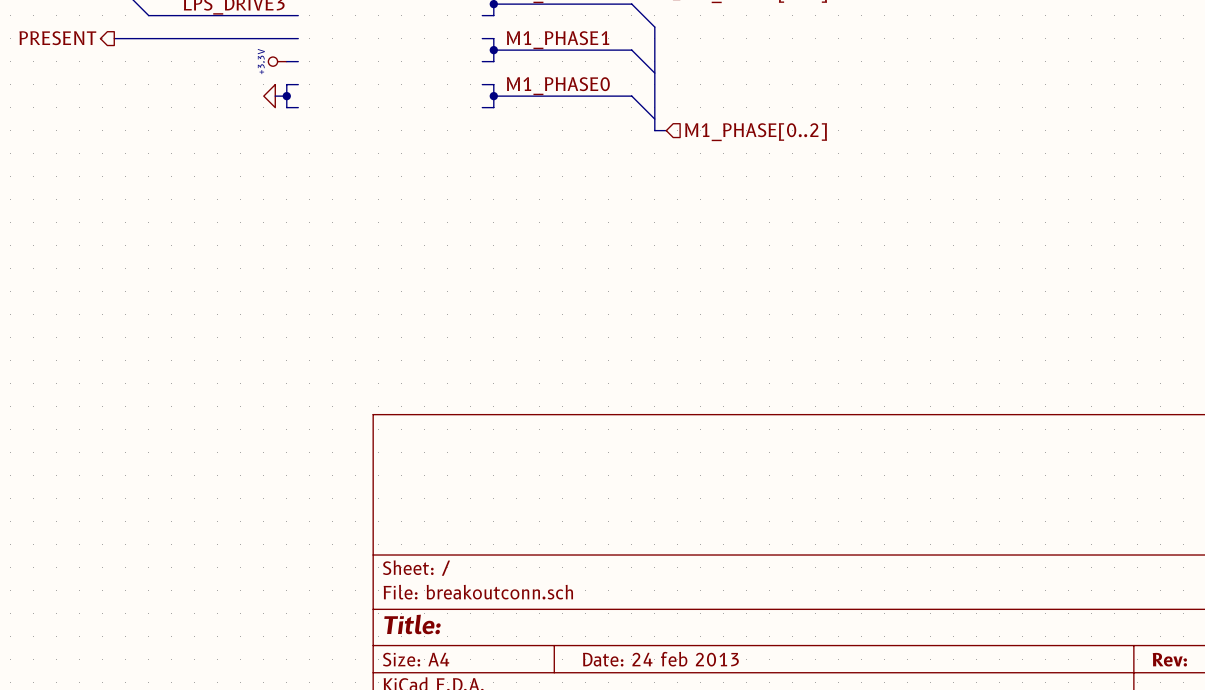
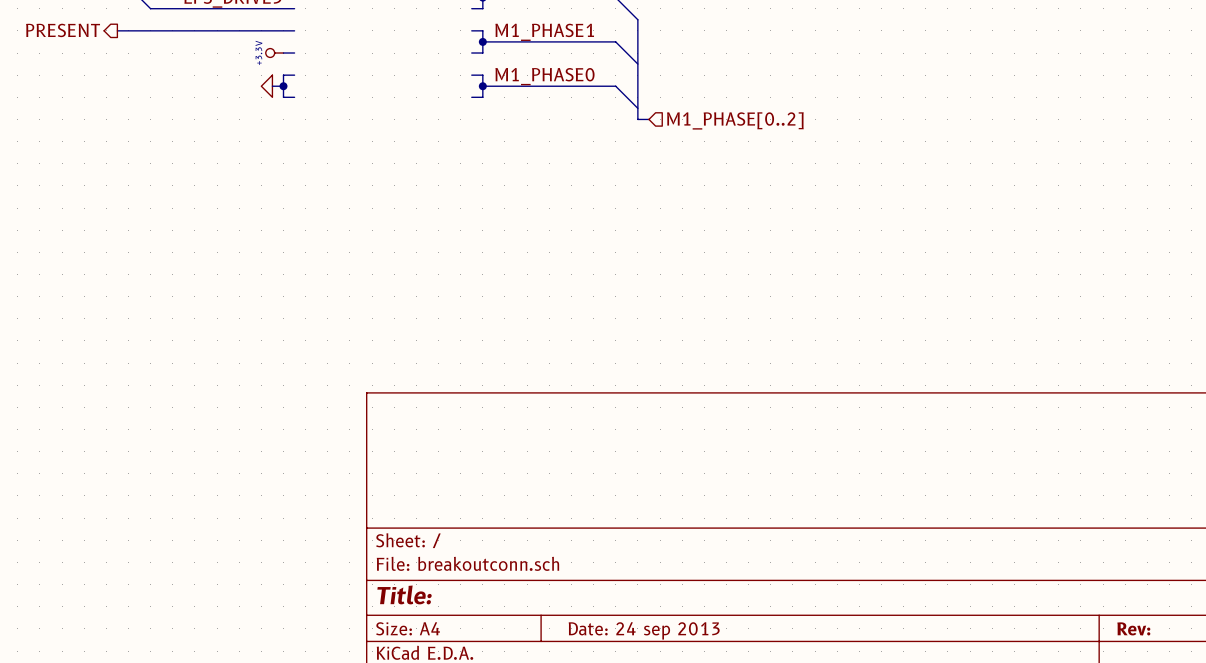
title block: Date: 24 feb 2013 (660, 659) -> Date: 24 sep 2013 (644, 630)

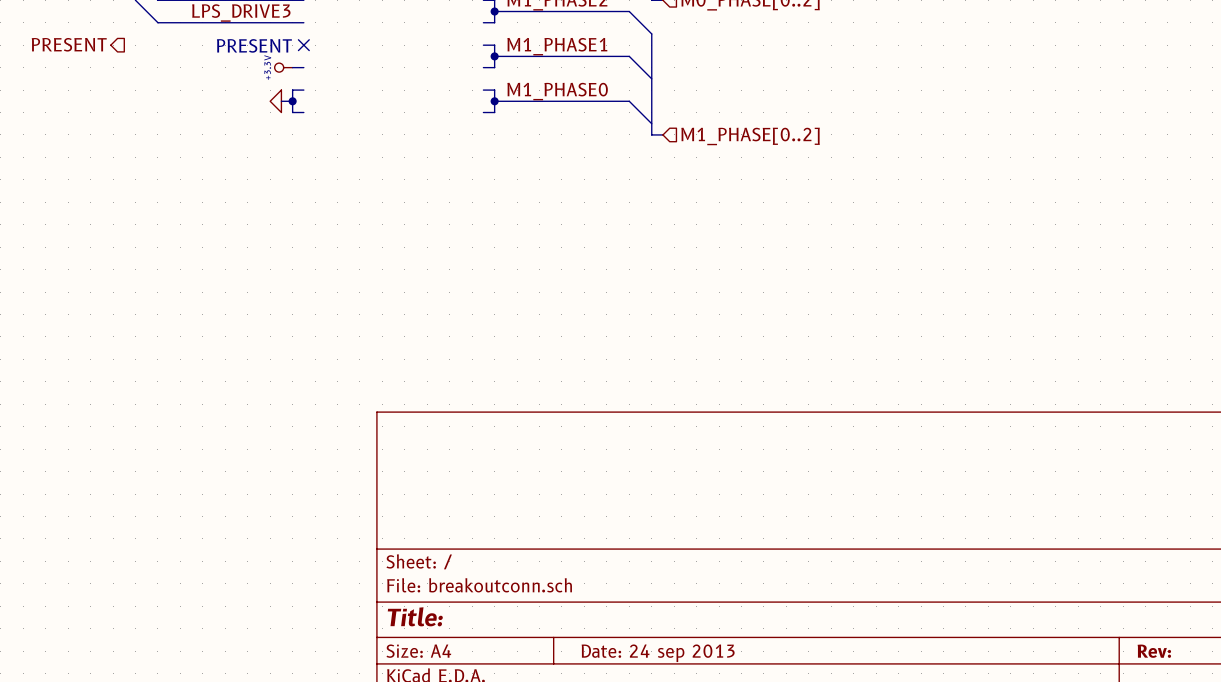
wire: (117, 30) (294, 30) -> none
no-connect mark: none -> (303, 45)
text: none -> PRESENT (254, 45)

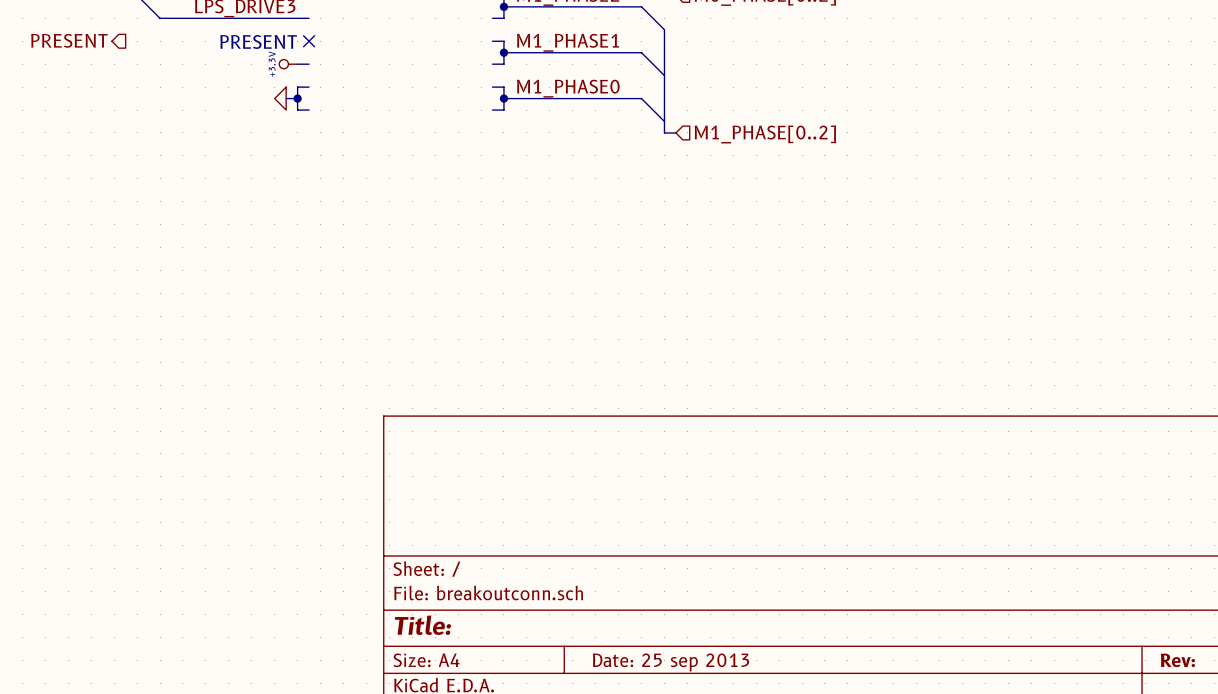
title block: Date: 24 sep 2013 (658, 653) -> Date: 25 sep 2013 (670, 662)

